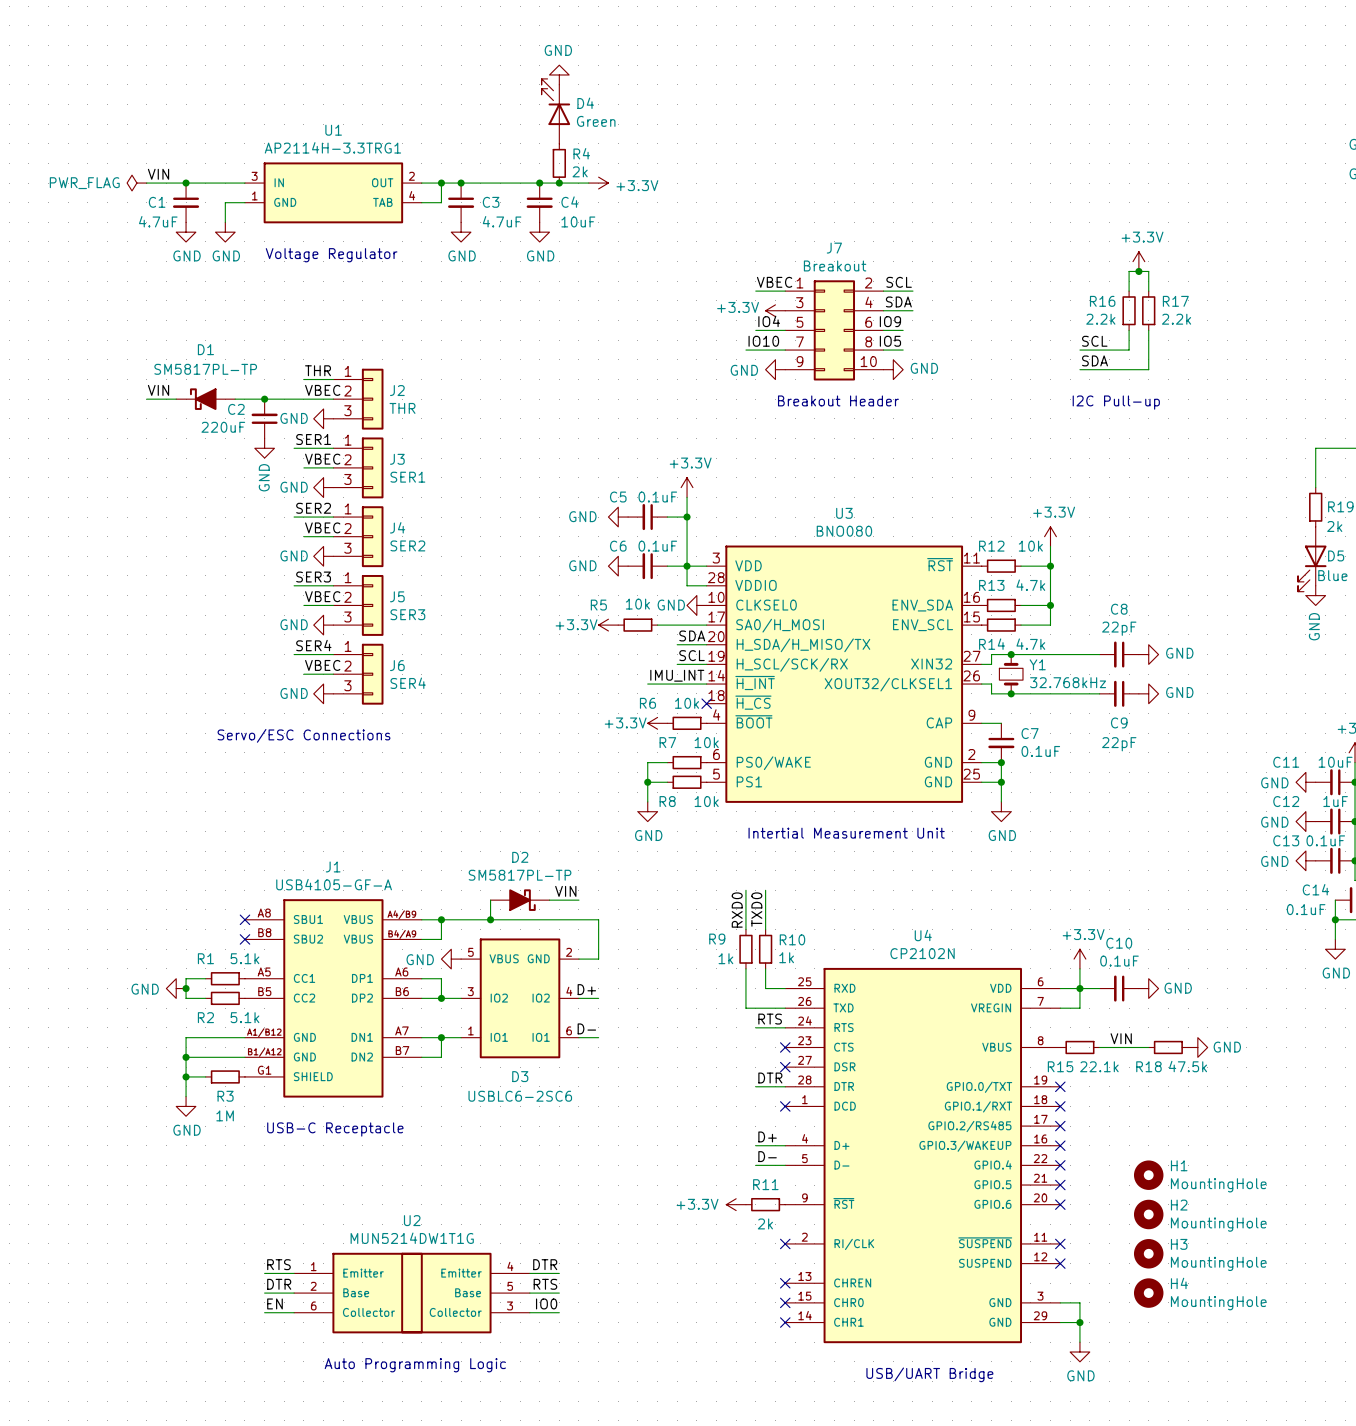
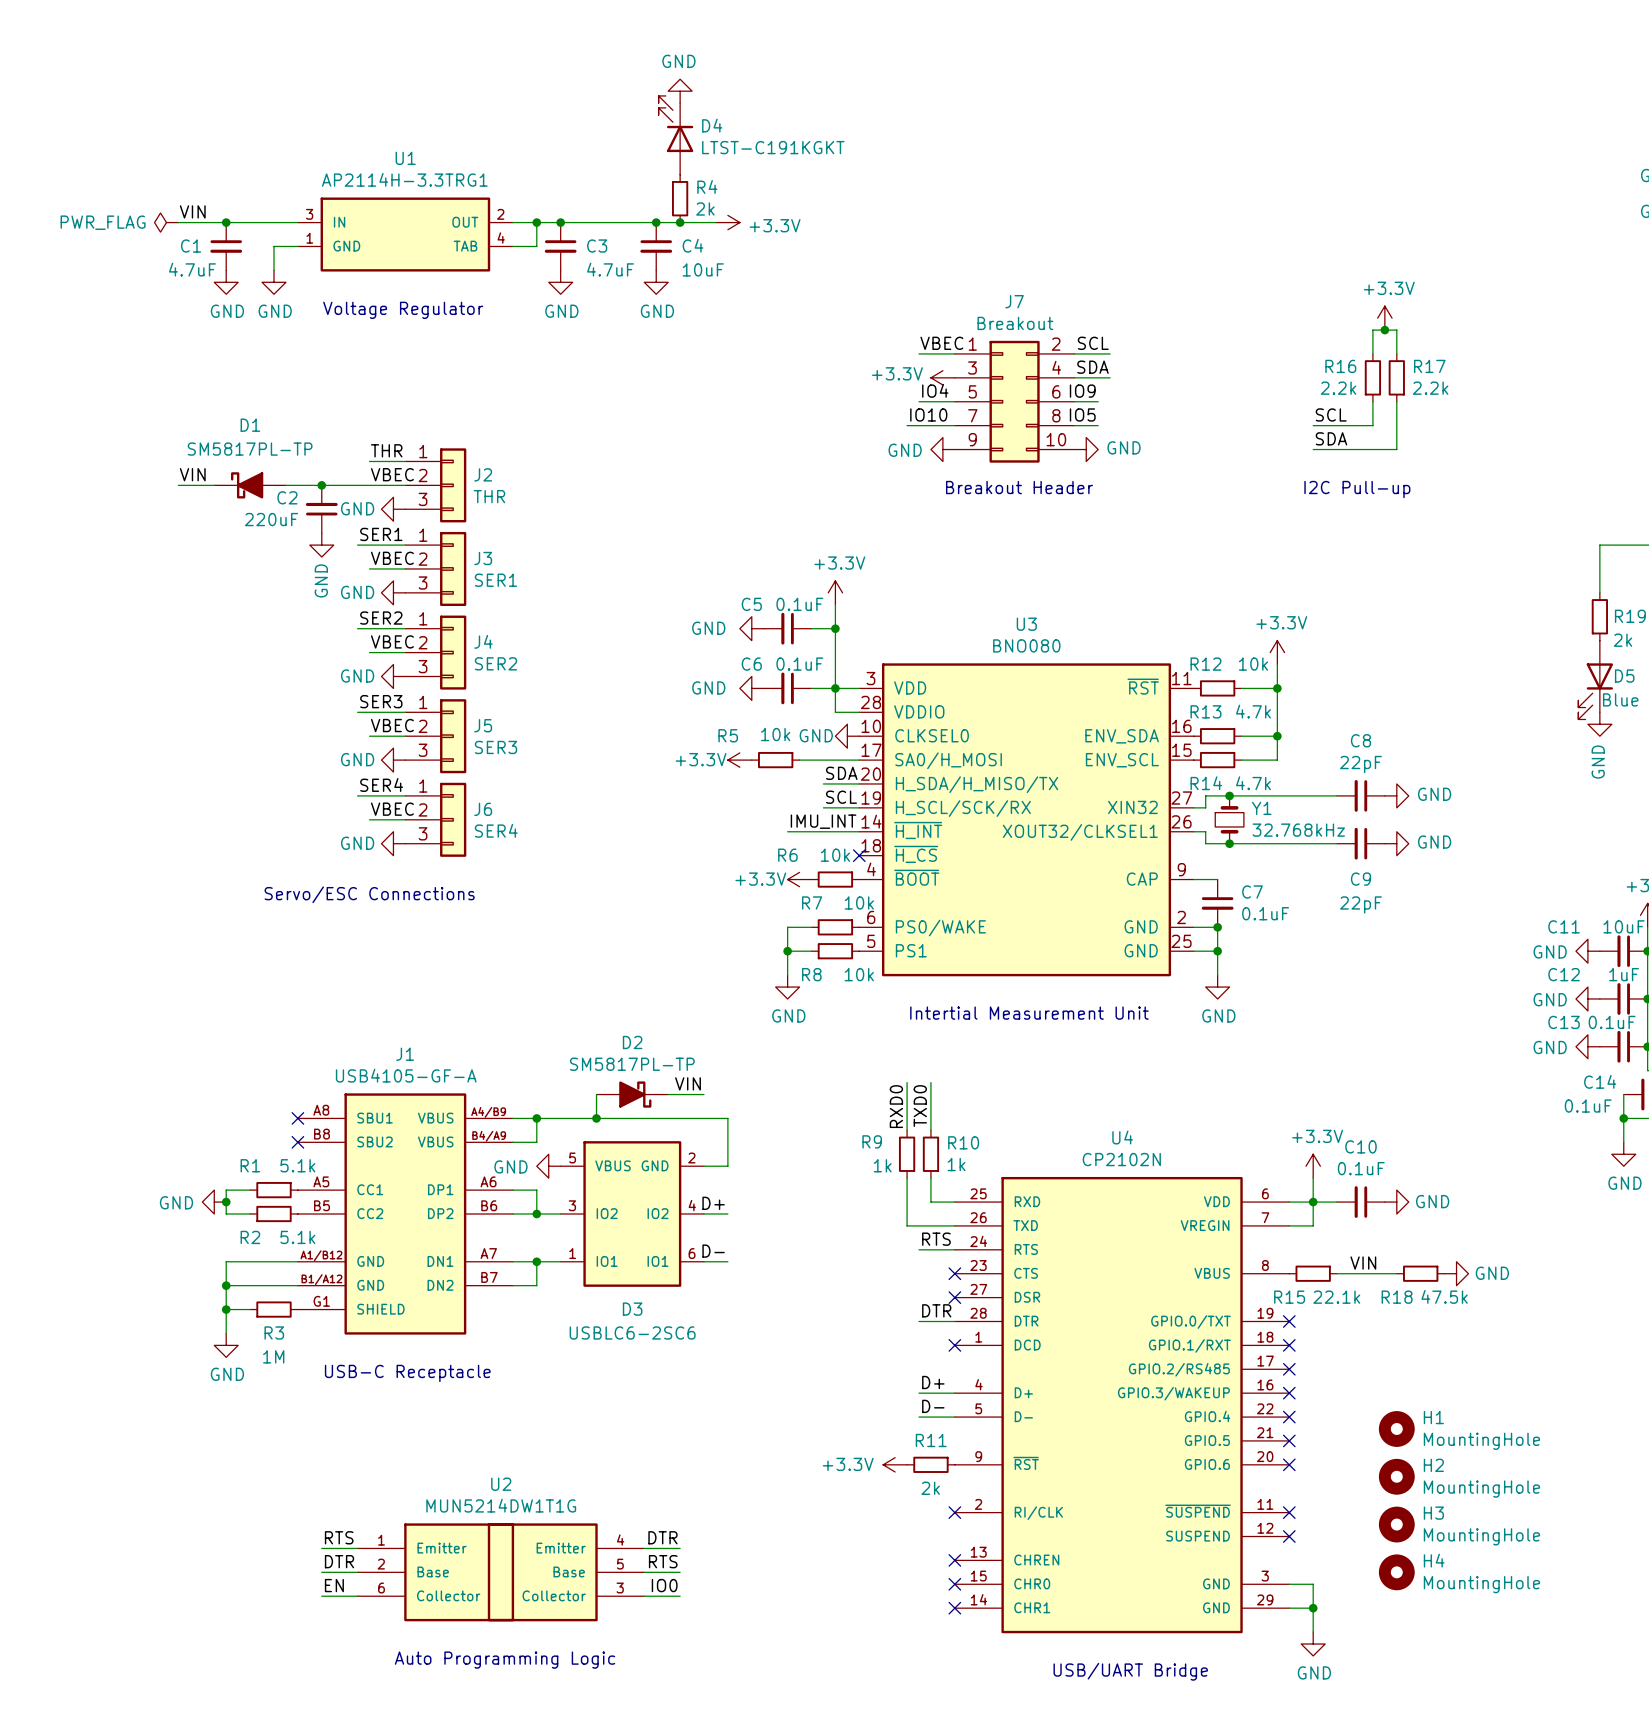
D4 value: Green (596, 121) -> LTST-C191KGKT (773, 147)

